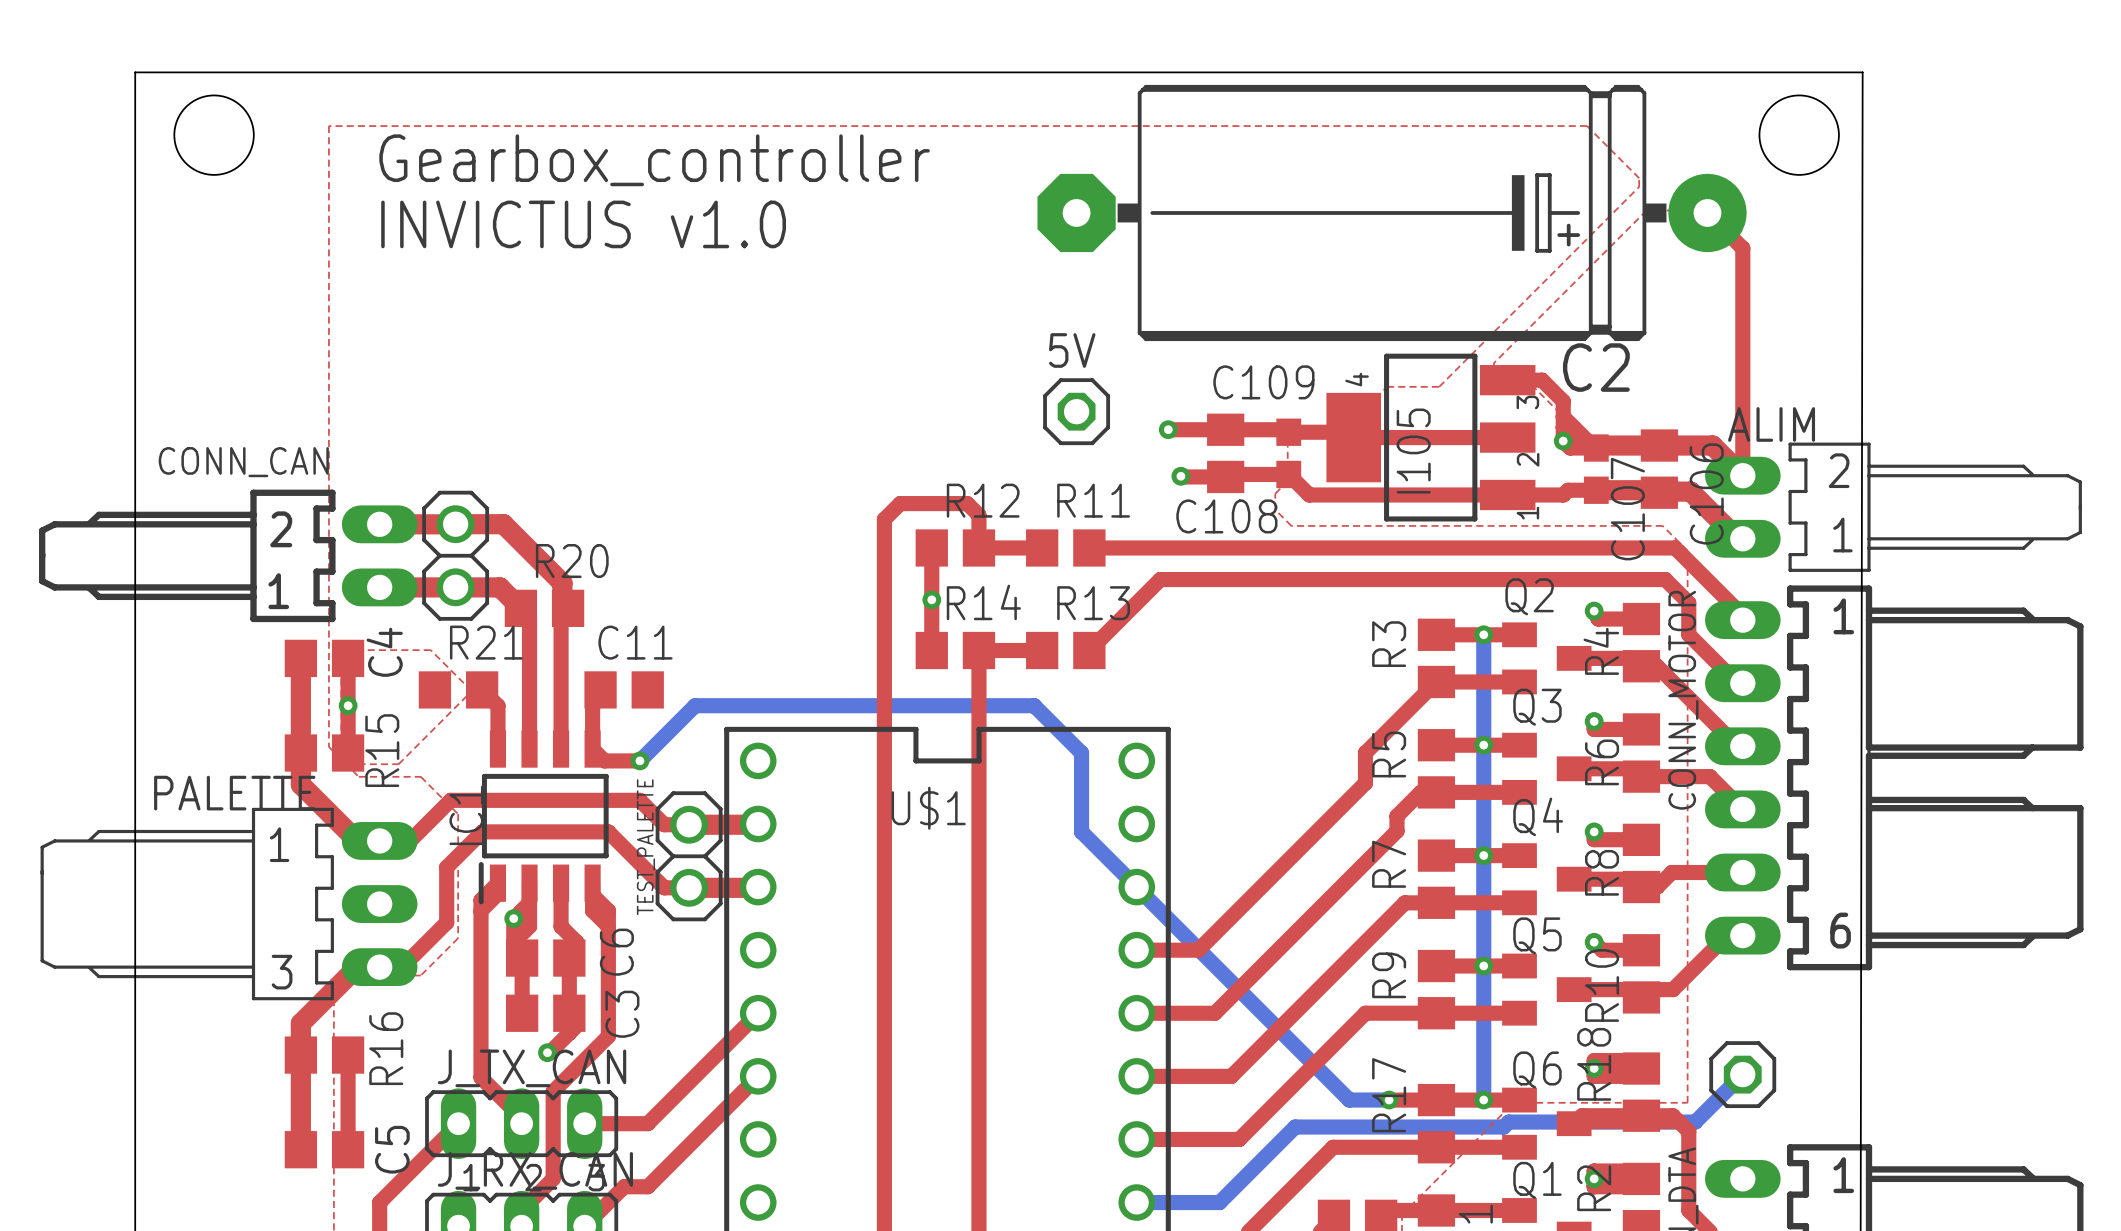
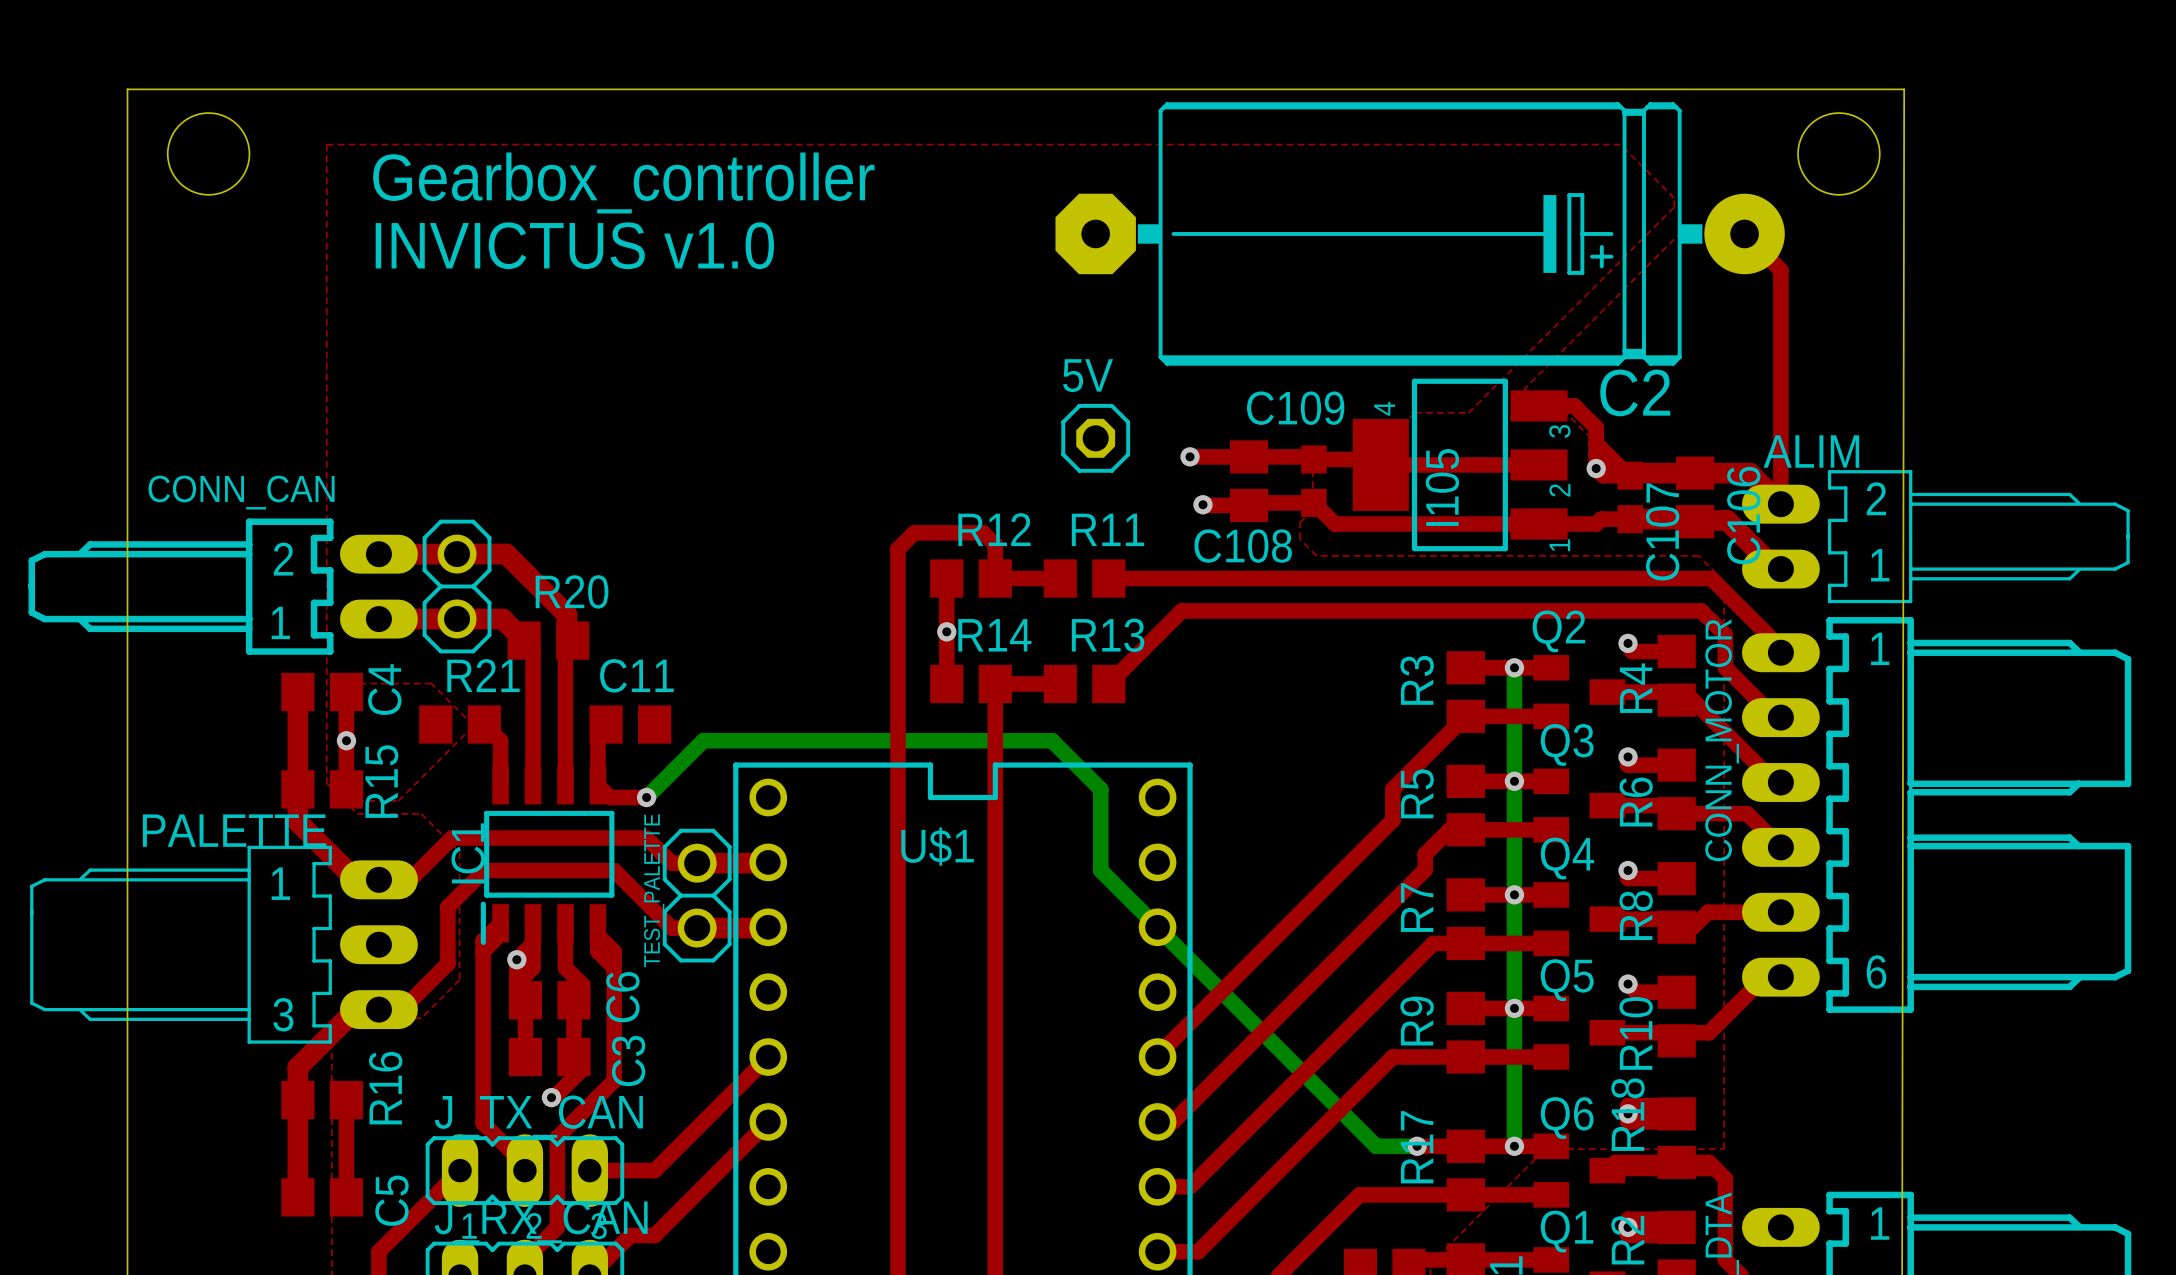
top track: (1136, 950) (1198, 950) -> (1157, 1057) (1220, 992)
top track: (1136, 1013) (1214, 1013) -> (1173, 1121) (1237, 1057)
bottom track: (1742, 1074) (1695, 1122) (1508, 1122) (1503, 1127) (1295, 1127) (1219, 1202) (1136, 1202) -> none
part: (1742, 1074) -> none
top track: (1151, 1076) (1231, 1076) -> none
top track: (1168, 1139) (1239, 1139) -> (1190, 1186) (1254, 1121)
top track: none -> (1263, 1186) (1198, 1251) (1157, 1251)

